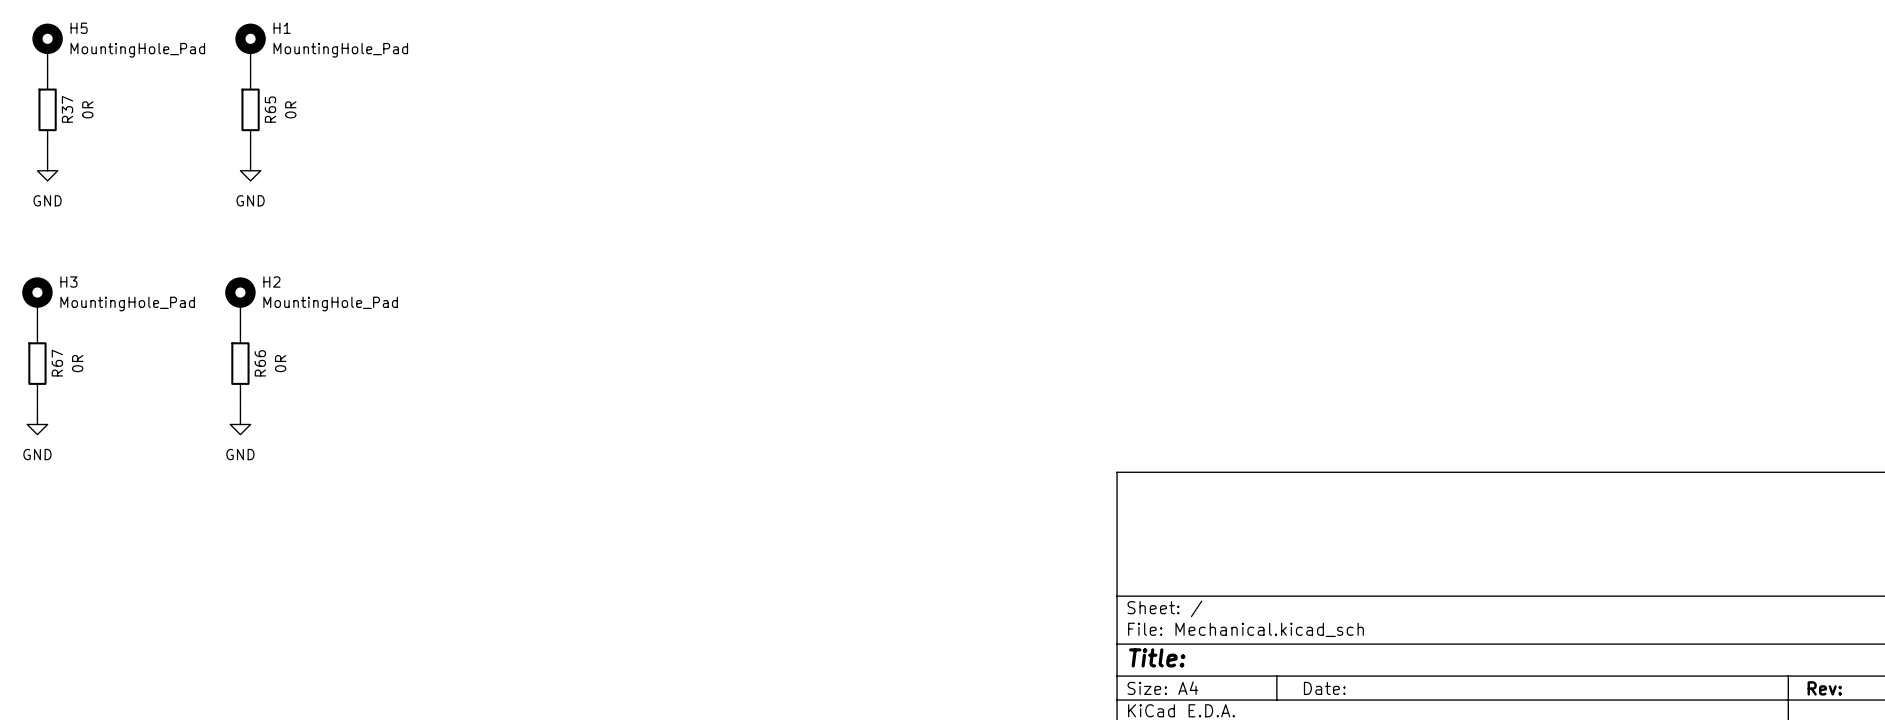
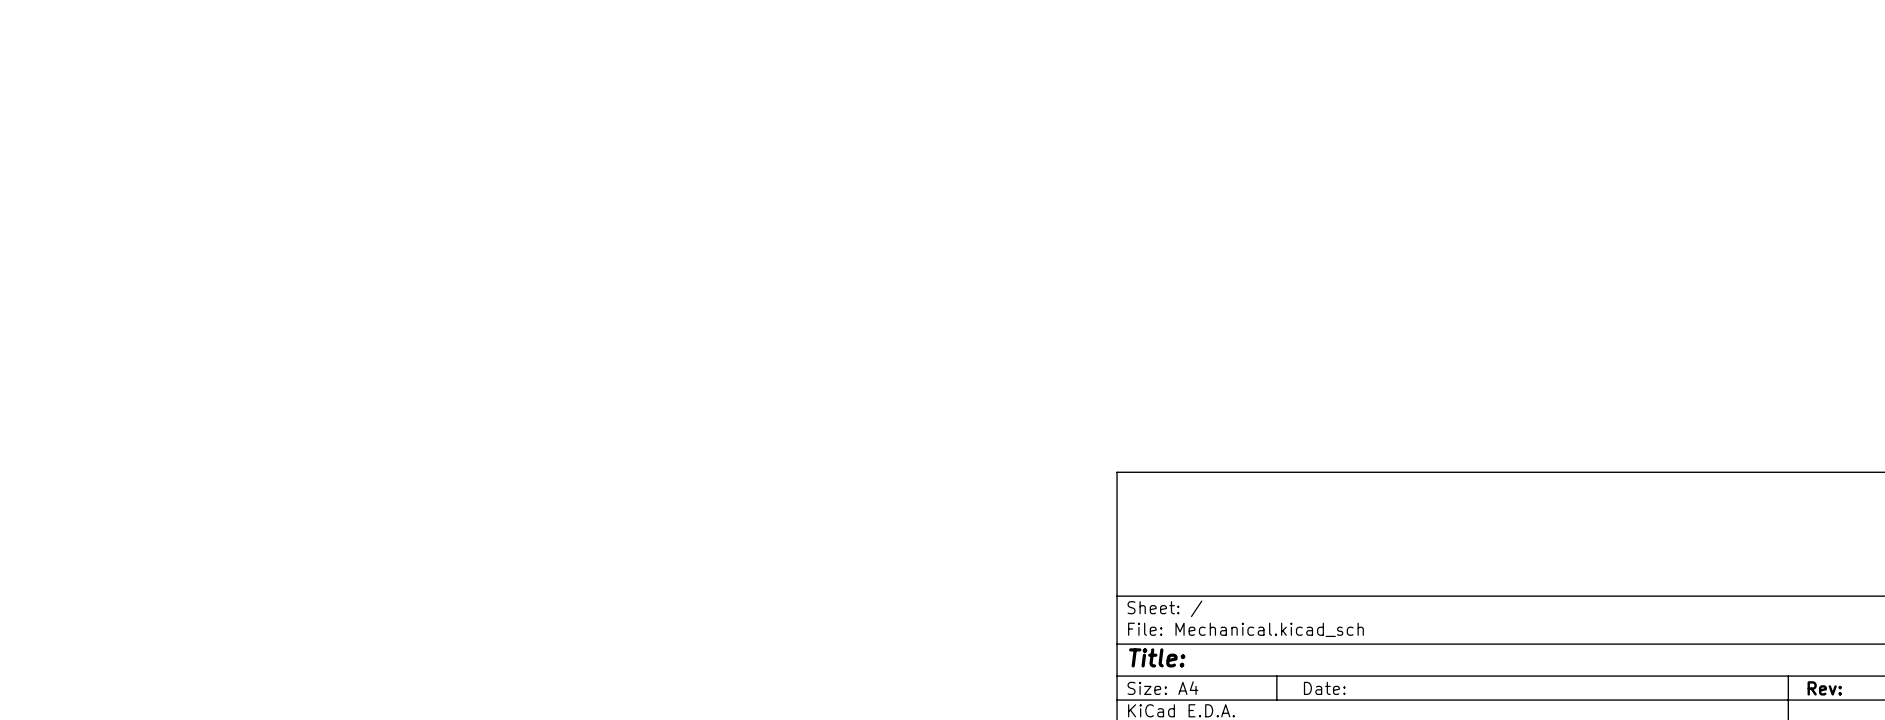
H5: MountingHole_Pad (47, 46) -> none
H1: MountingHole_Pad (250, 46) -> none
wire: (47, 69) (47, 79) -> none
wire: (250, 69) (250, 79) -> none
R37: 0R (47, 109) -> none
R65: 0R (250, 109) -> none
wire: (47, 140) (47, 160) -> none
wire: (250, 140) (250, 160) -> none
power symbol: GND (47, 170) -> none
power symbol: GND (250, 170) -> none
H3: MountingHole_Pad (37, 300) -> none
H2: MountingHole_Pad (240, 300) -> none
wire: (37, 322) (37, 333) -> none
wire: (240, 322) (240, 333) -> none
R67: 0R (37, 363) -> none
R66: 0R (240, 363) -> none
wire: (37, 394) (37, 414) -> none
wire: (240, 394) (240, 414) -> none
power symbol: GND (37, 424) -> none
power symbol: GND (240, 424) -> none

